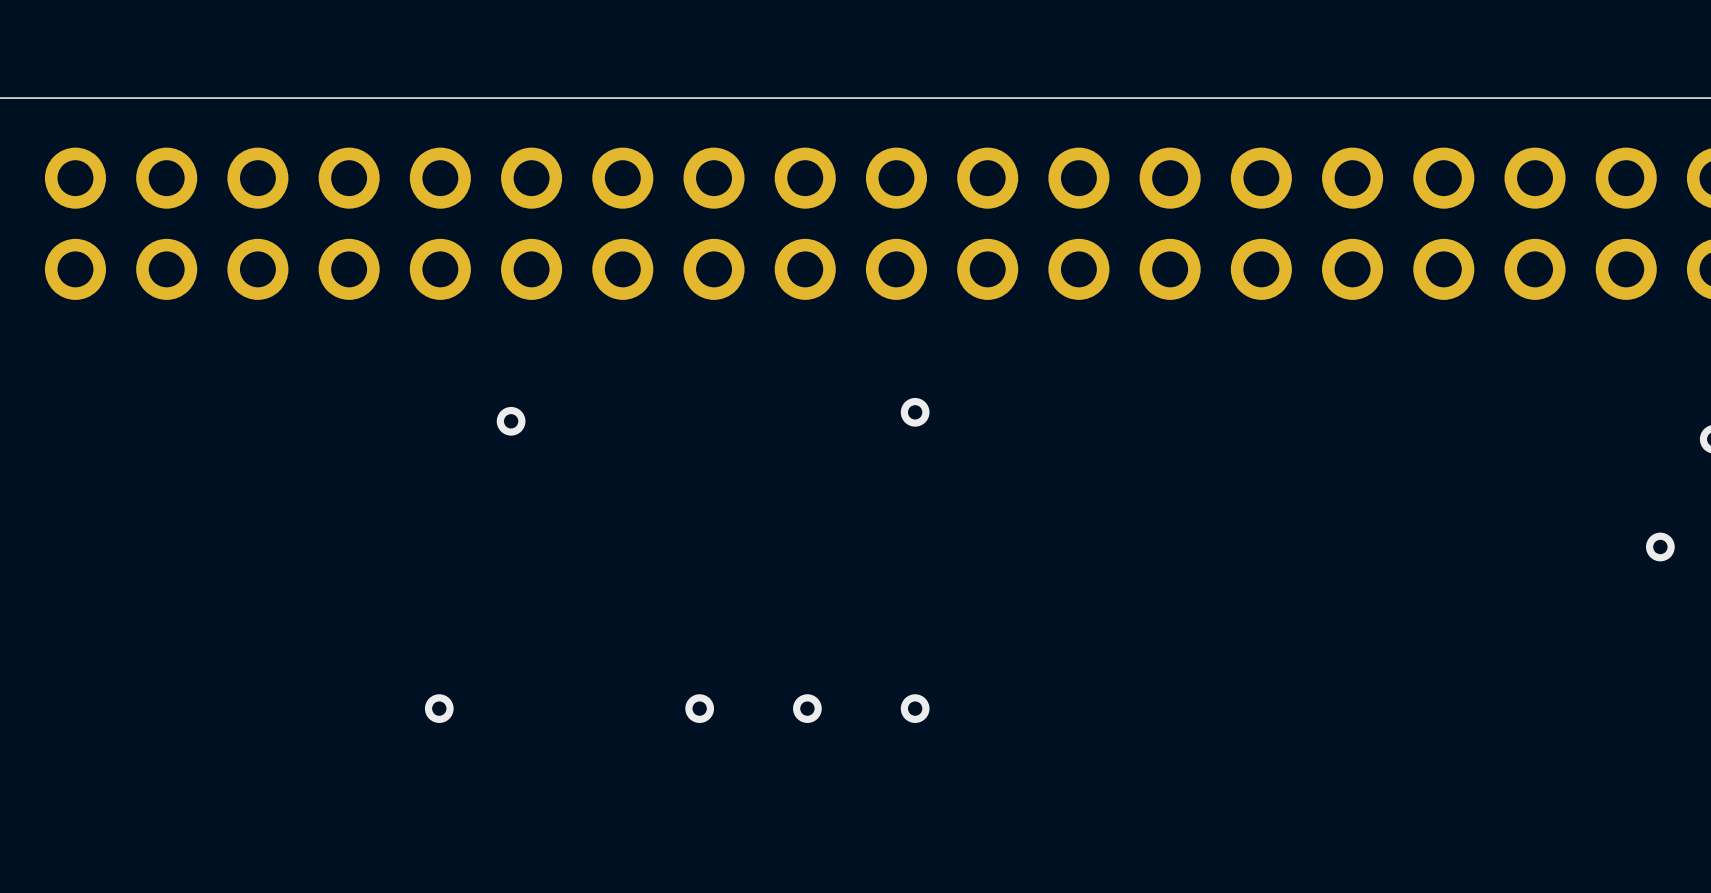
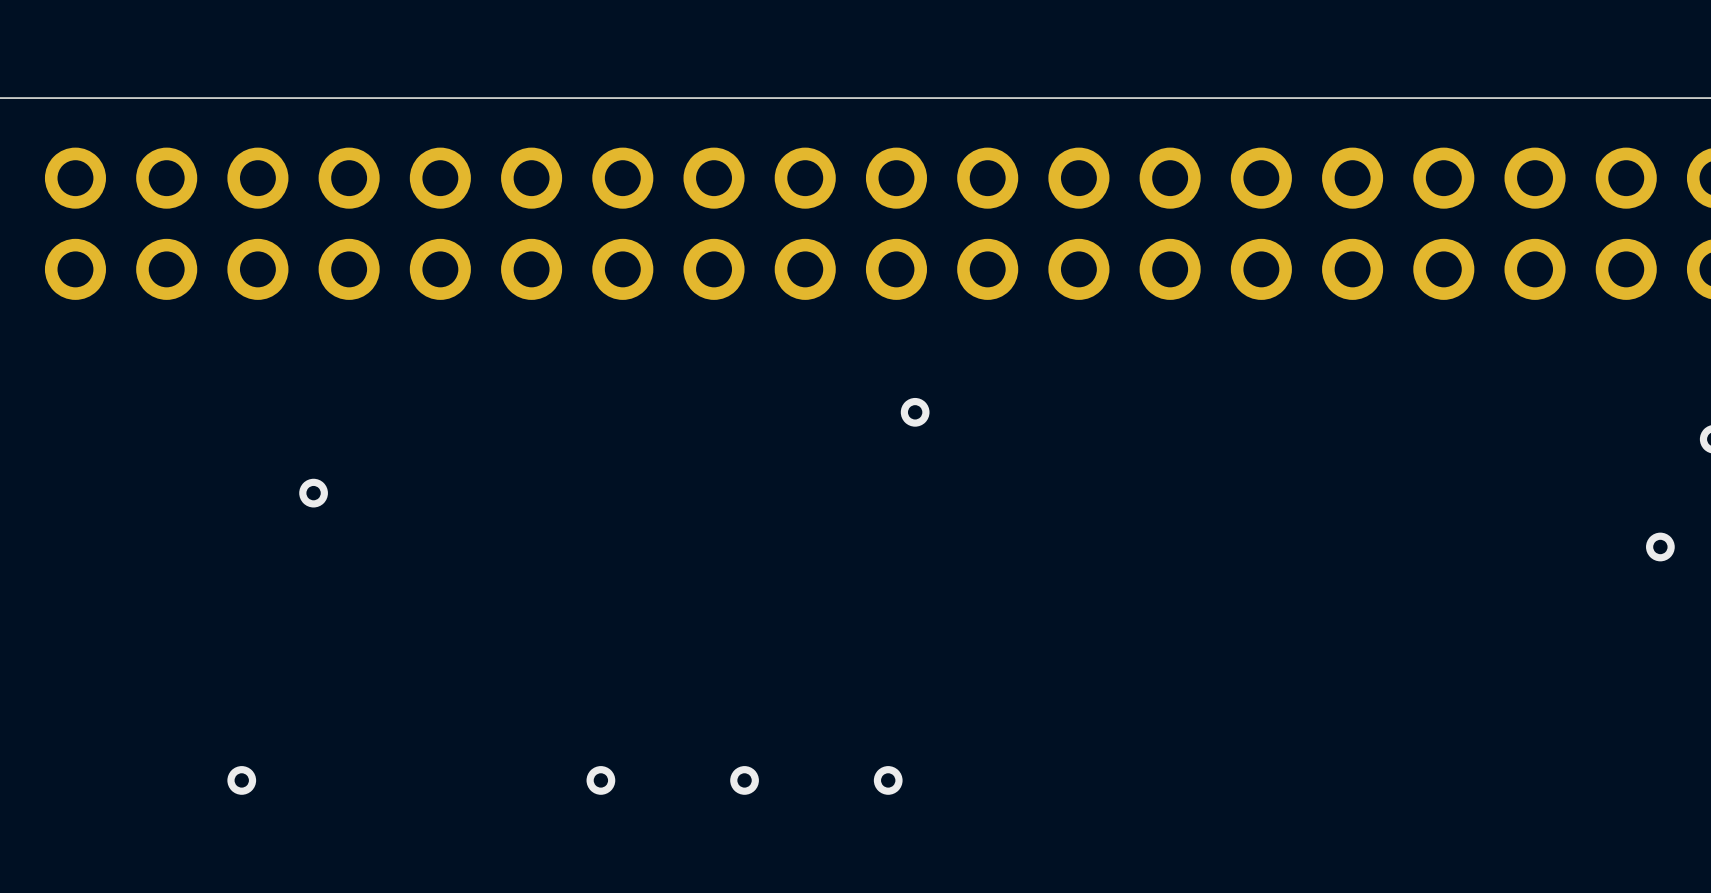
via: (511, 421) -> none
via: none -> (313, 493)
via: (439, 708) -> none
via: (699, 708) -> none
via: (807, 708) -> none
via: (915, 708) -> none
via: none -> (241, 780)
via: none -> (600, 780)
via: none -> (744, 780)
via: none -> (888, 780)

